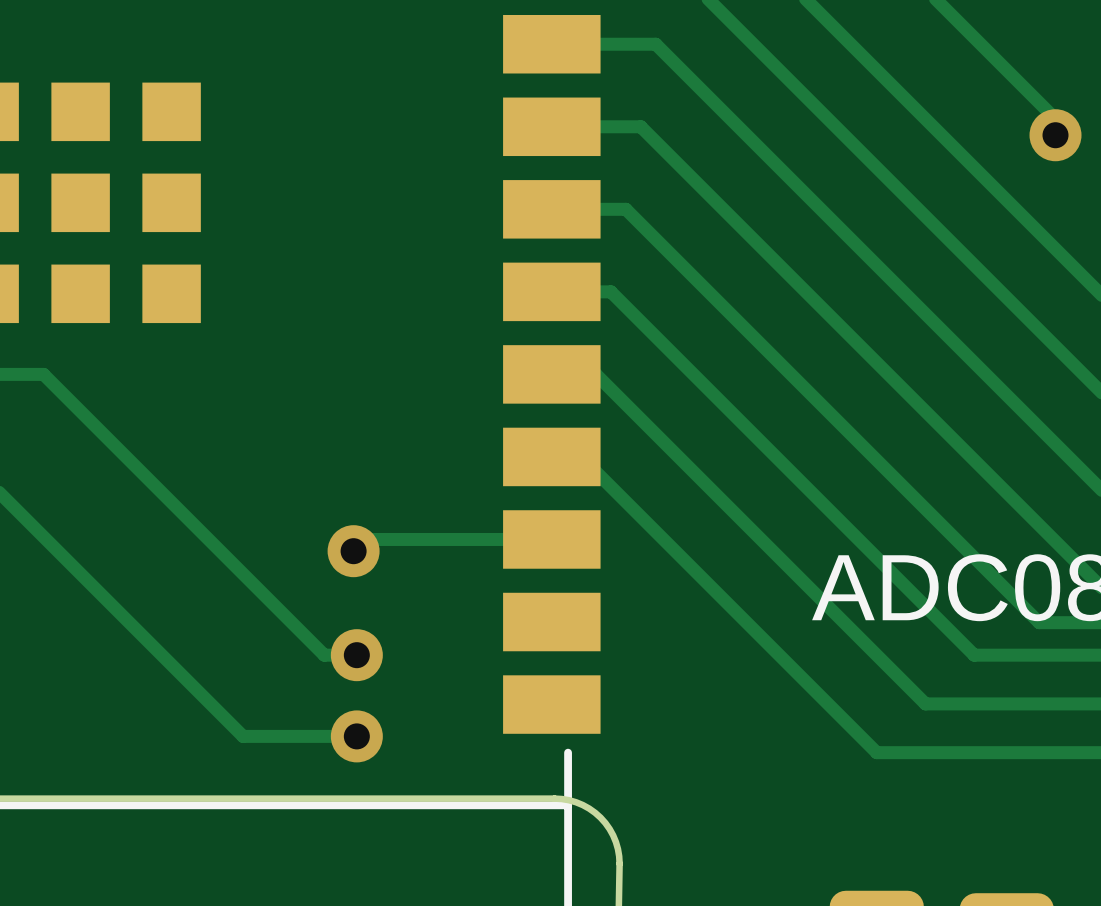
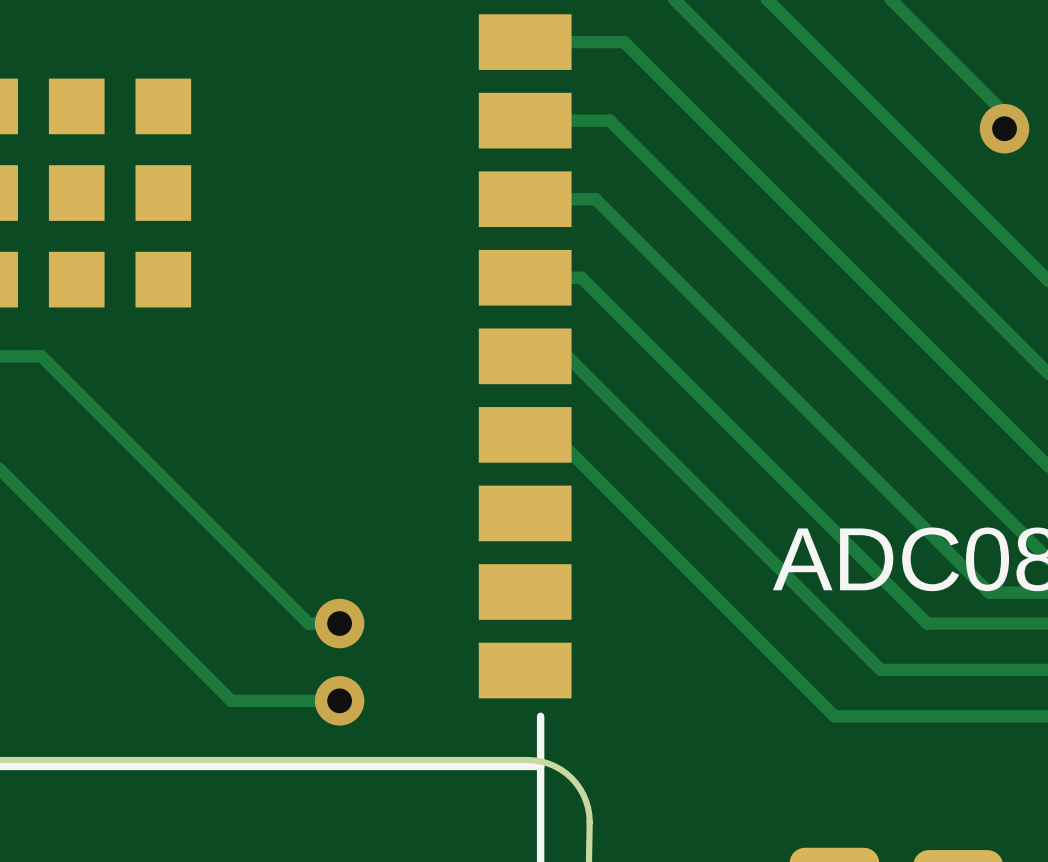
track: (551, 539) (365, 539) (353, 551) -> none
via: (353, 551) -> none

